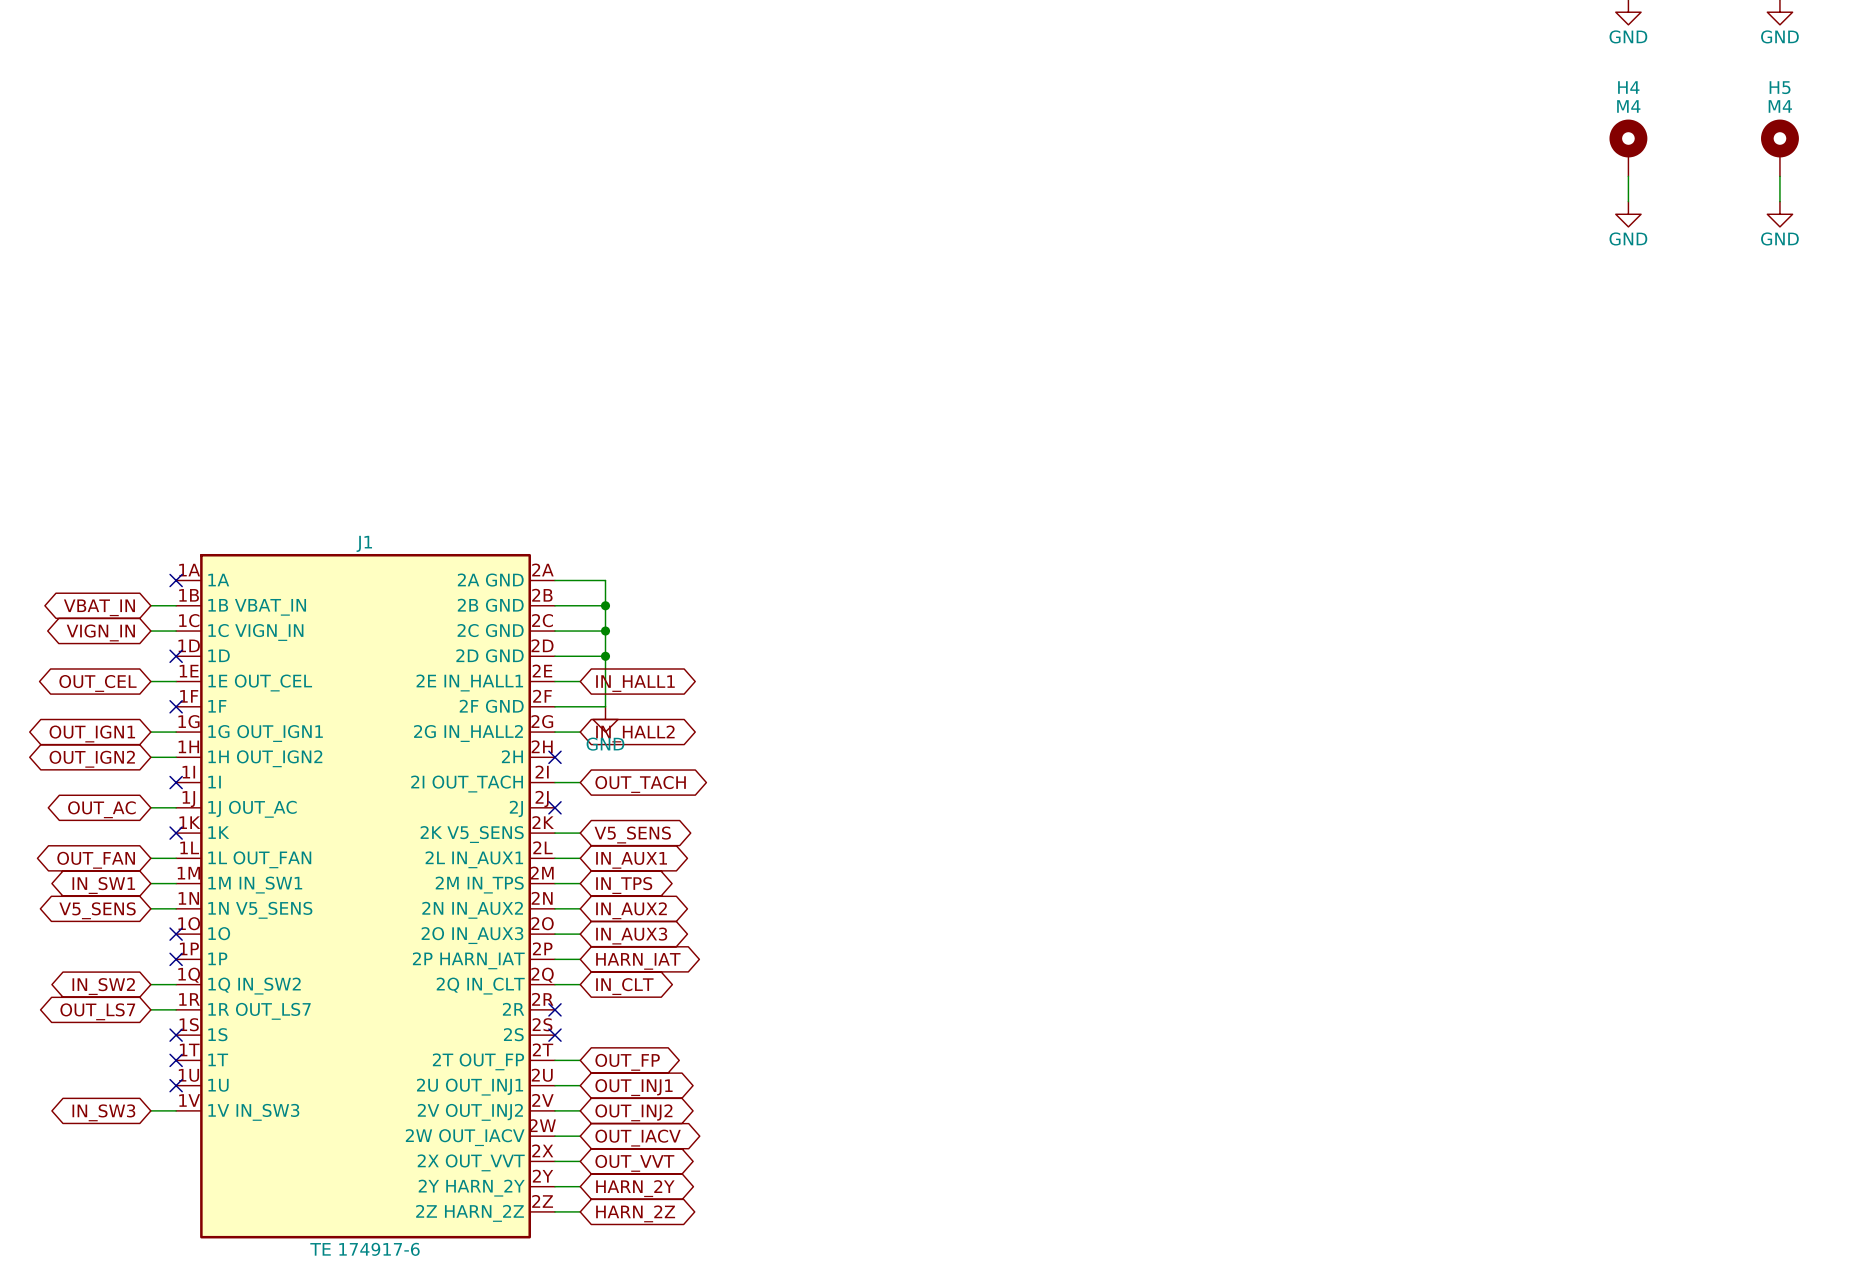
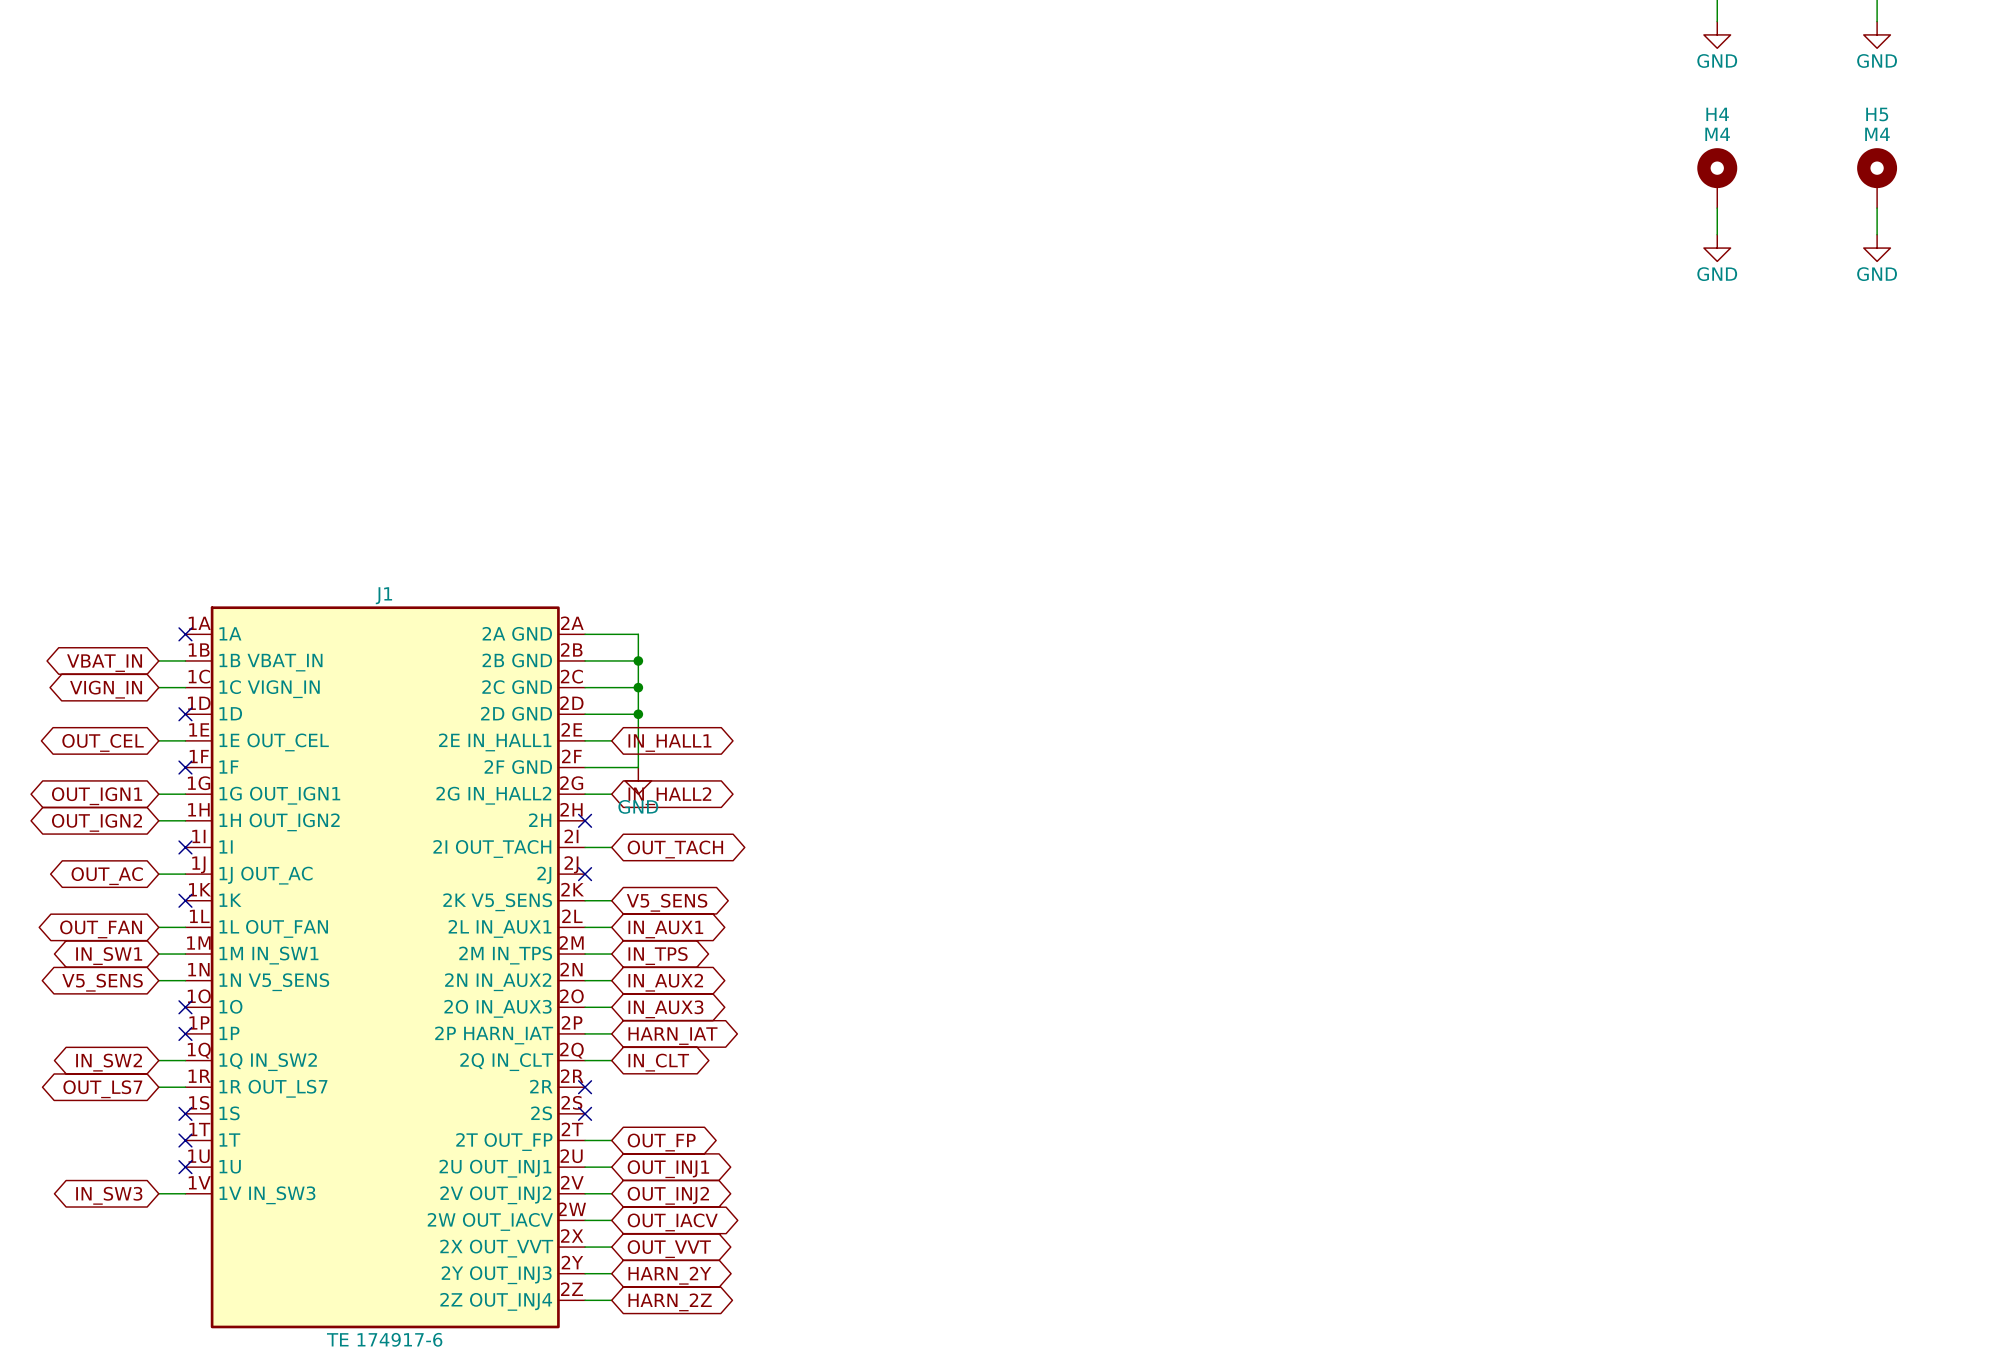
J1 pin name: 2Y HARN_2Y (471, 1188) -> 2Y OUT_INJ3 (496, 1275)
J1 pin name: 2Z HARN_2Z (470, 1213) -> 2Z OUT_INJ4 (496, 1301)

